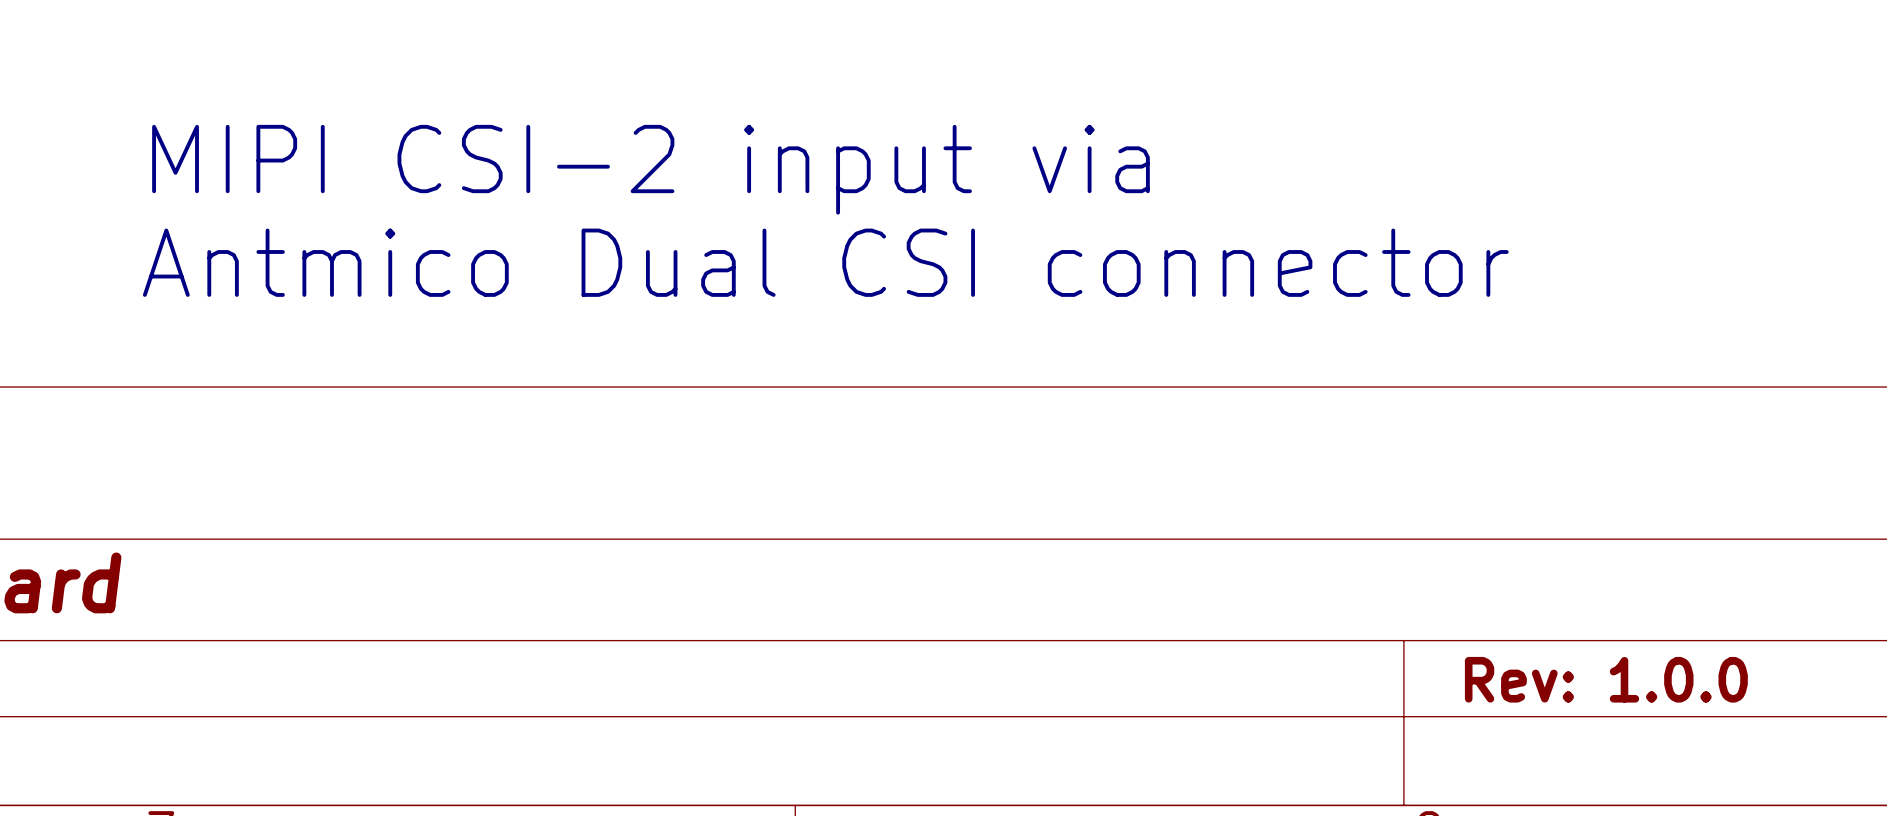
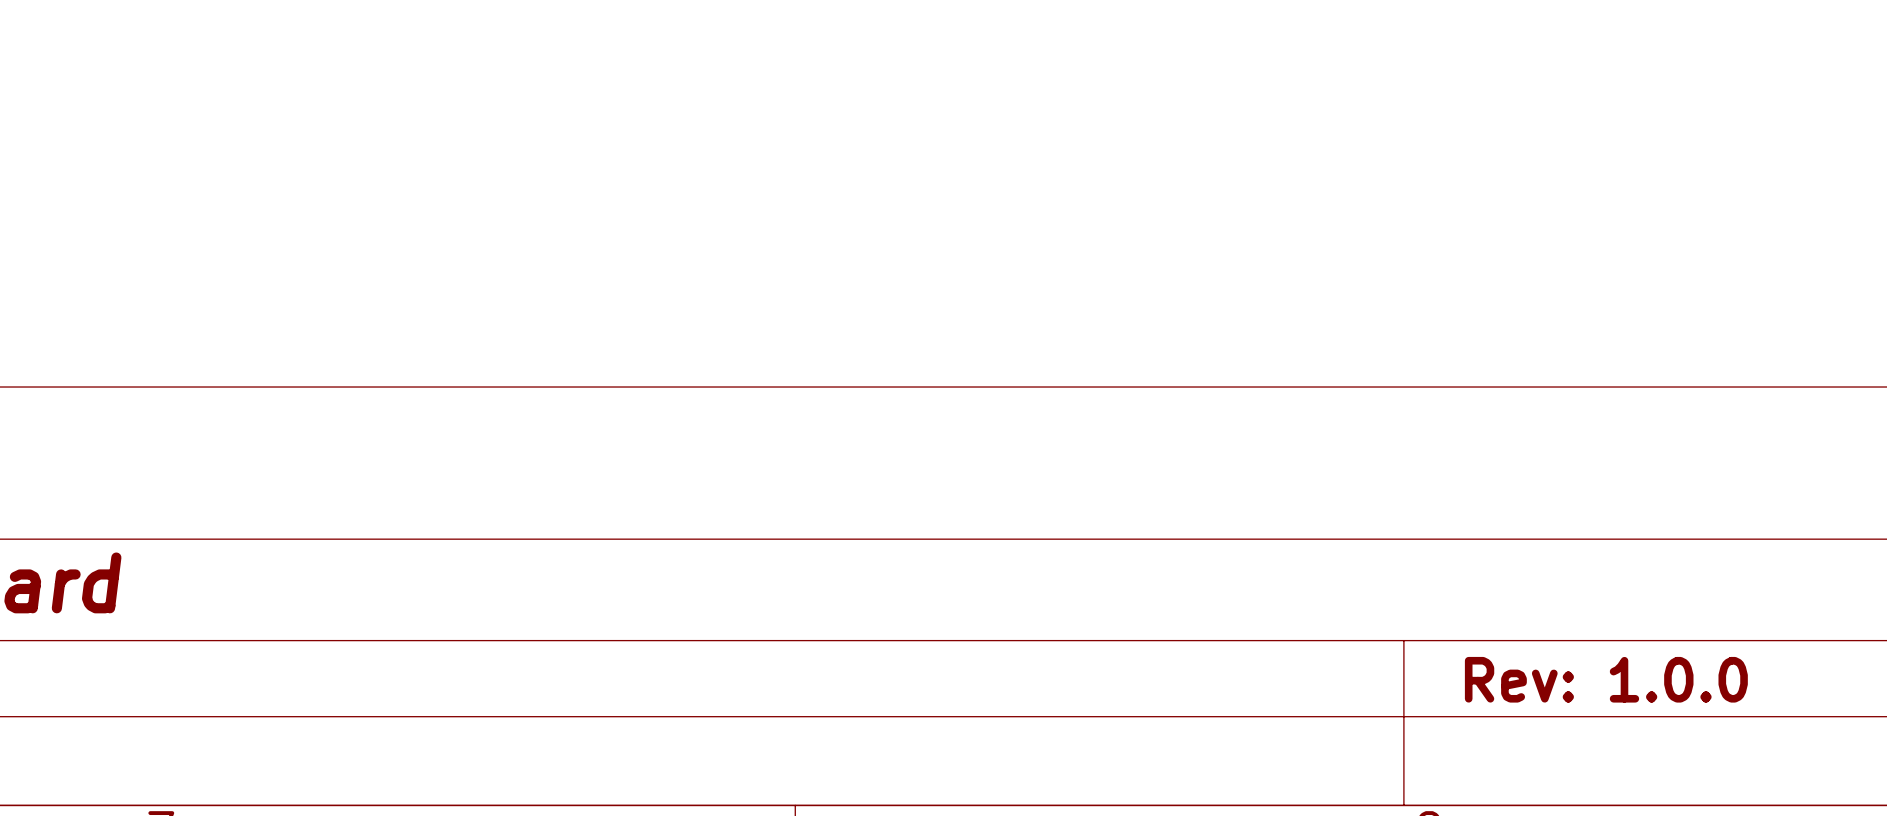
text: MIPI CSI-2 input via (650, 169) -> none
text: Antmico Dual CSI connector (825, 262) -> none

